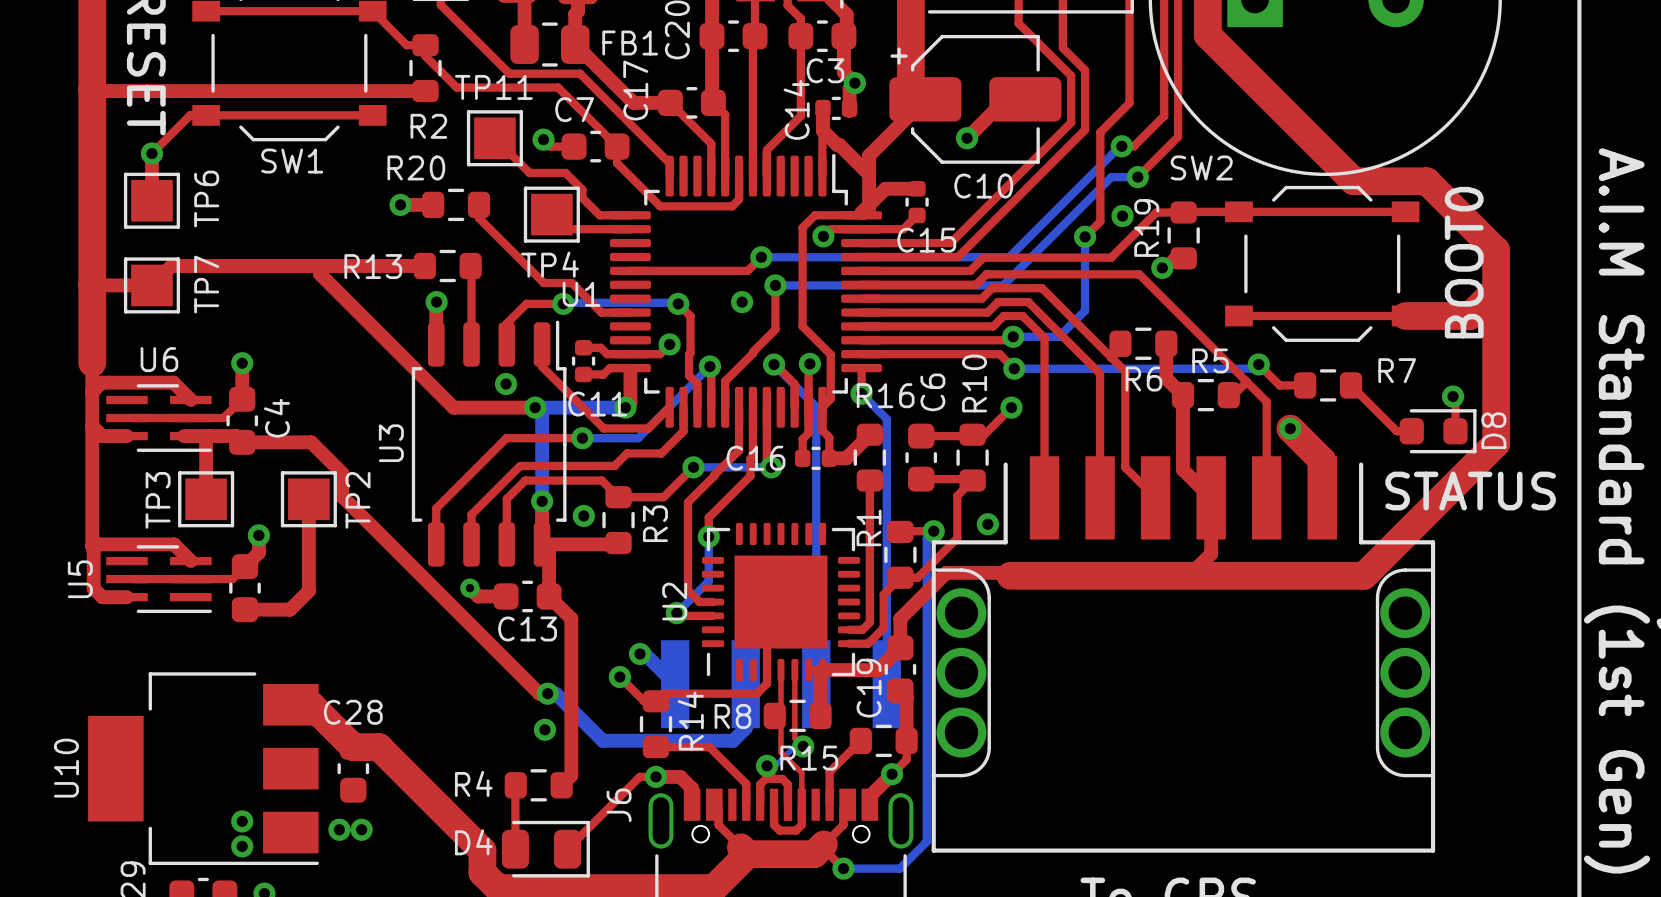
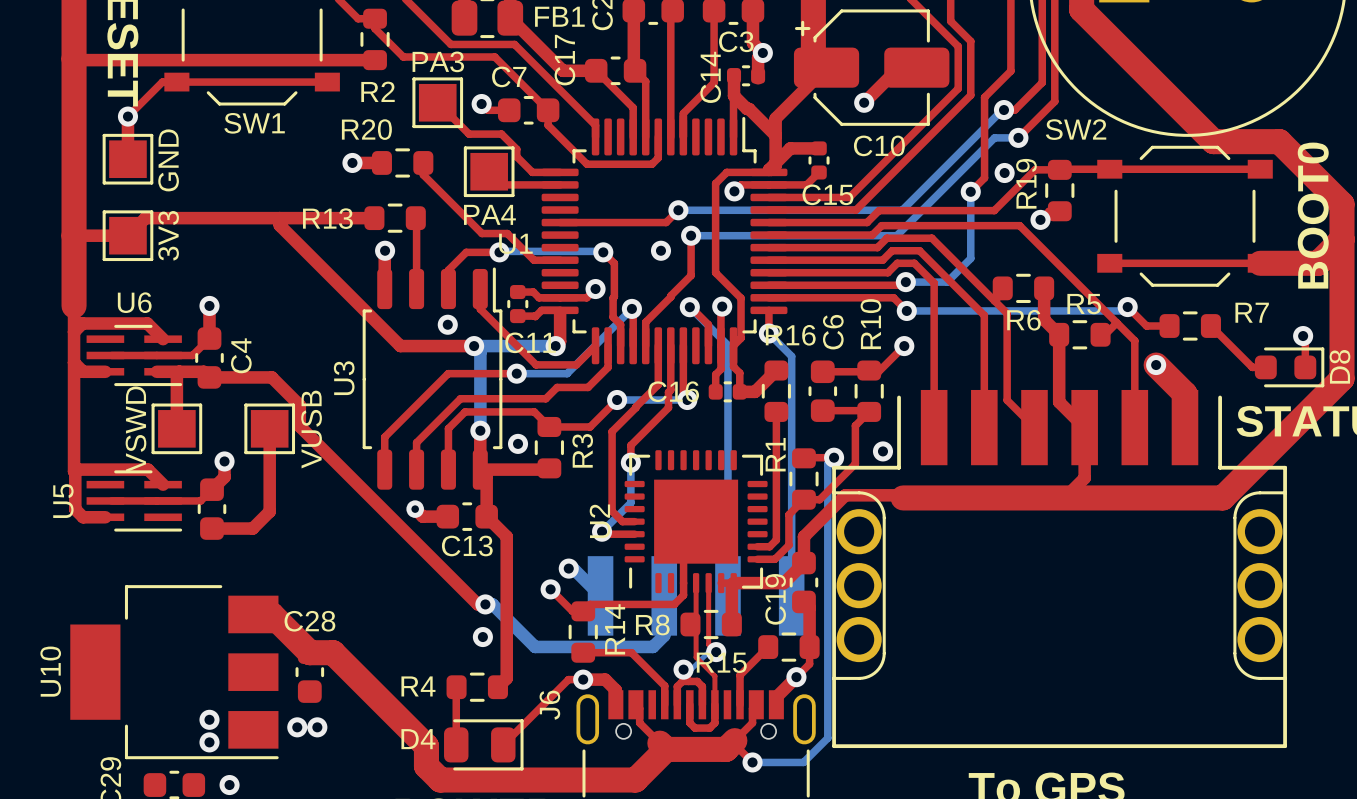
TP11 name: TP11 (493, 87) -> none
TP11 value: none -> PA3 (438, 61)
TP6 name: TP6 (206, 199) -> none
TP6 value: none -> GND (168, 160)
TP4 value: none -> PA4 (489, 214)
TP4 name: TP4 (549, 264) -> none
TP7 name: TP7 (206, 284) -> none
TP7 value: none -> 3V3 (168, 235)
TP3 name: TP3 (158, 500) -> none
TP3 value: none -> VSWD (135, 429)
TP2 value: none -> VUSB (311, 429)
TP2 name: TP2 (358, 500) -> none

